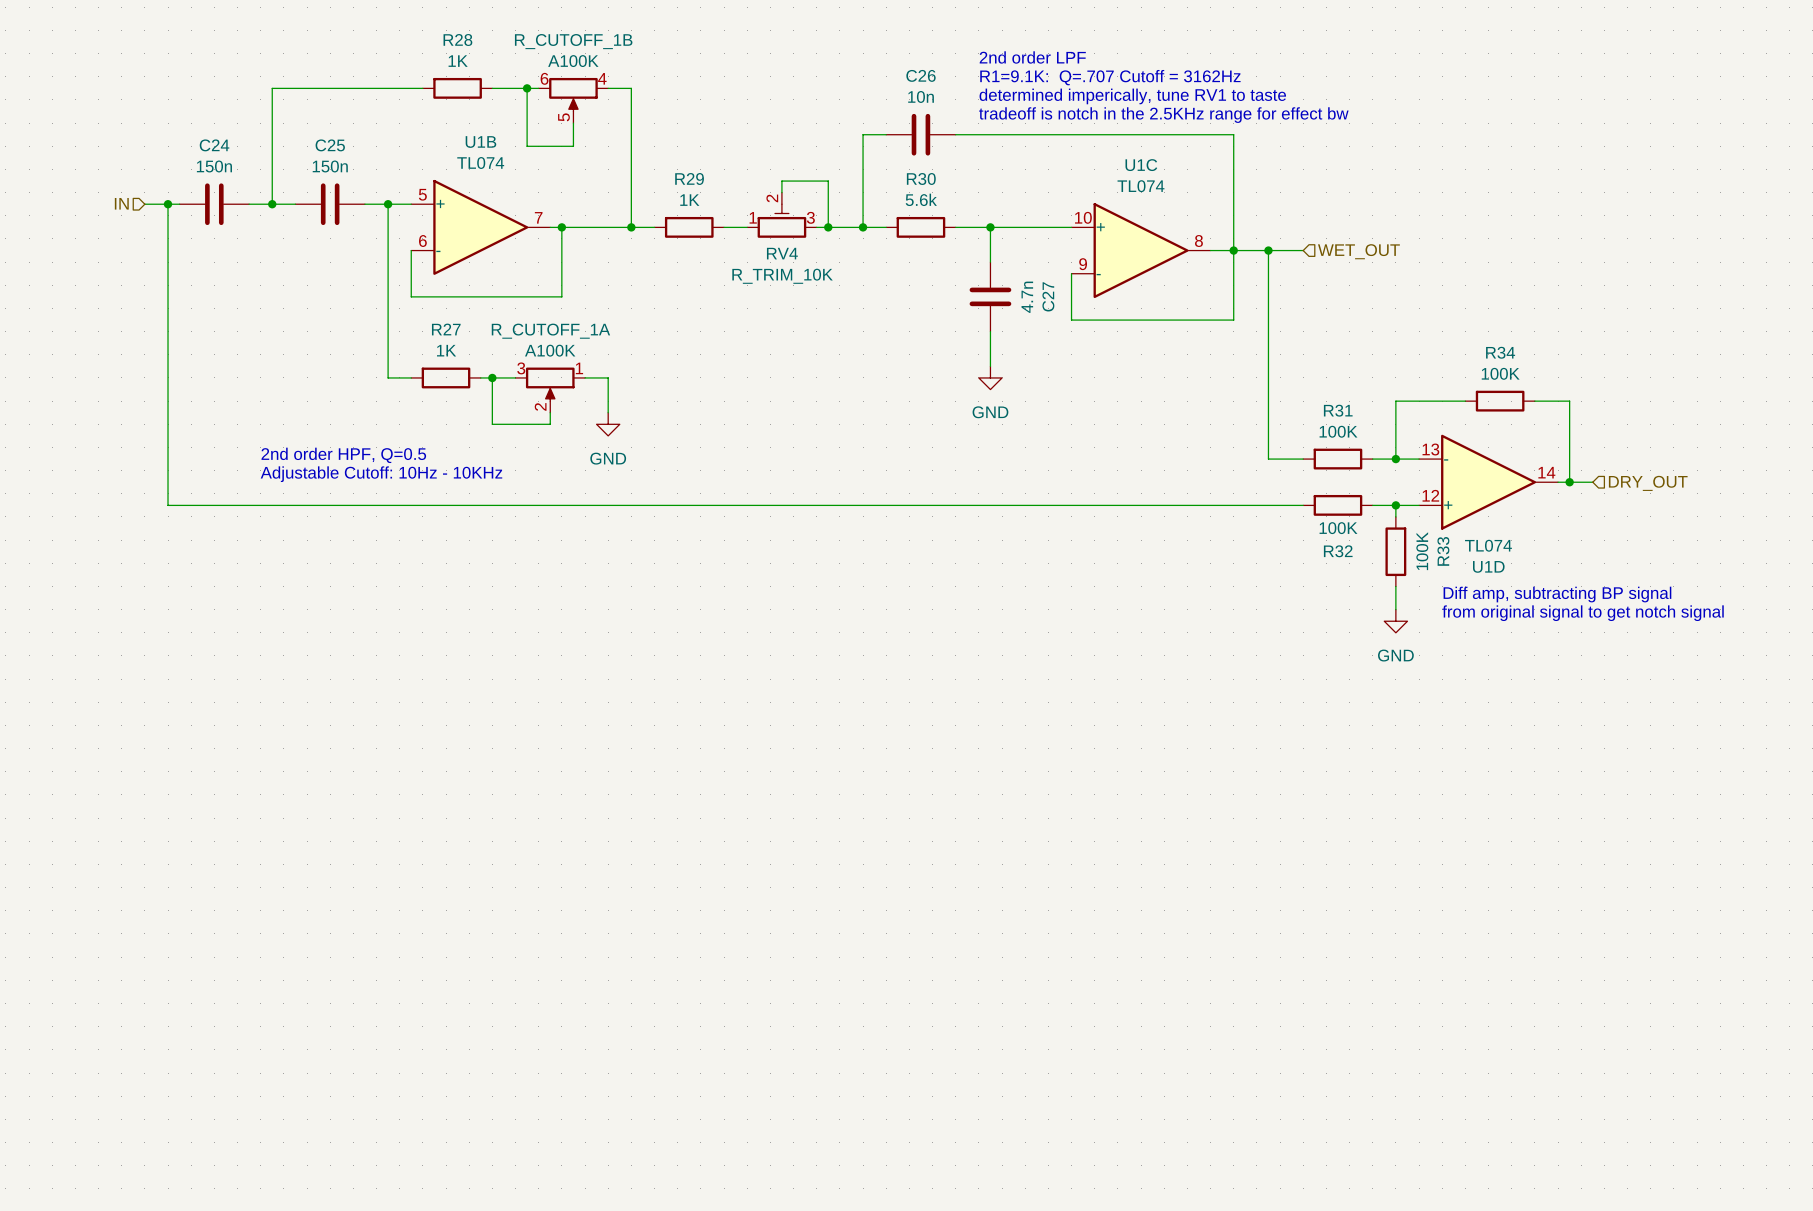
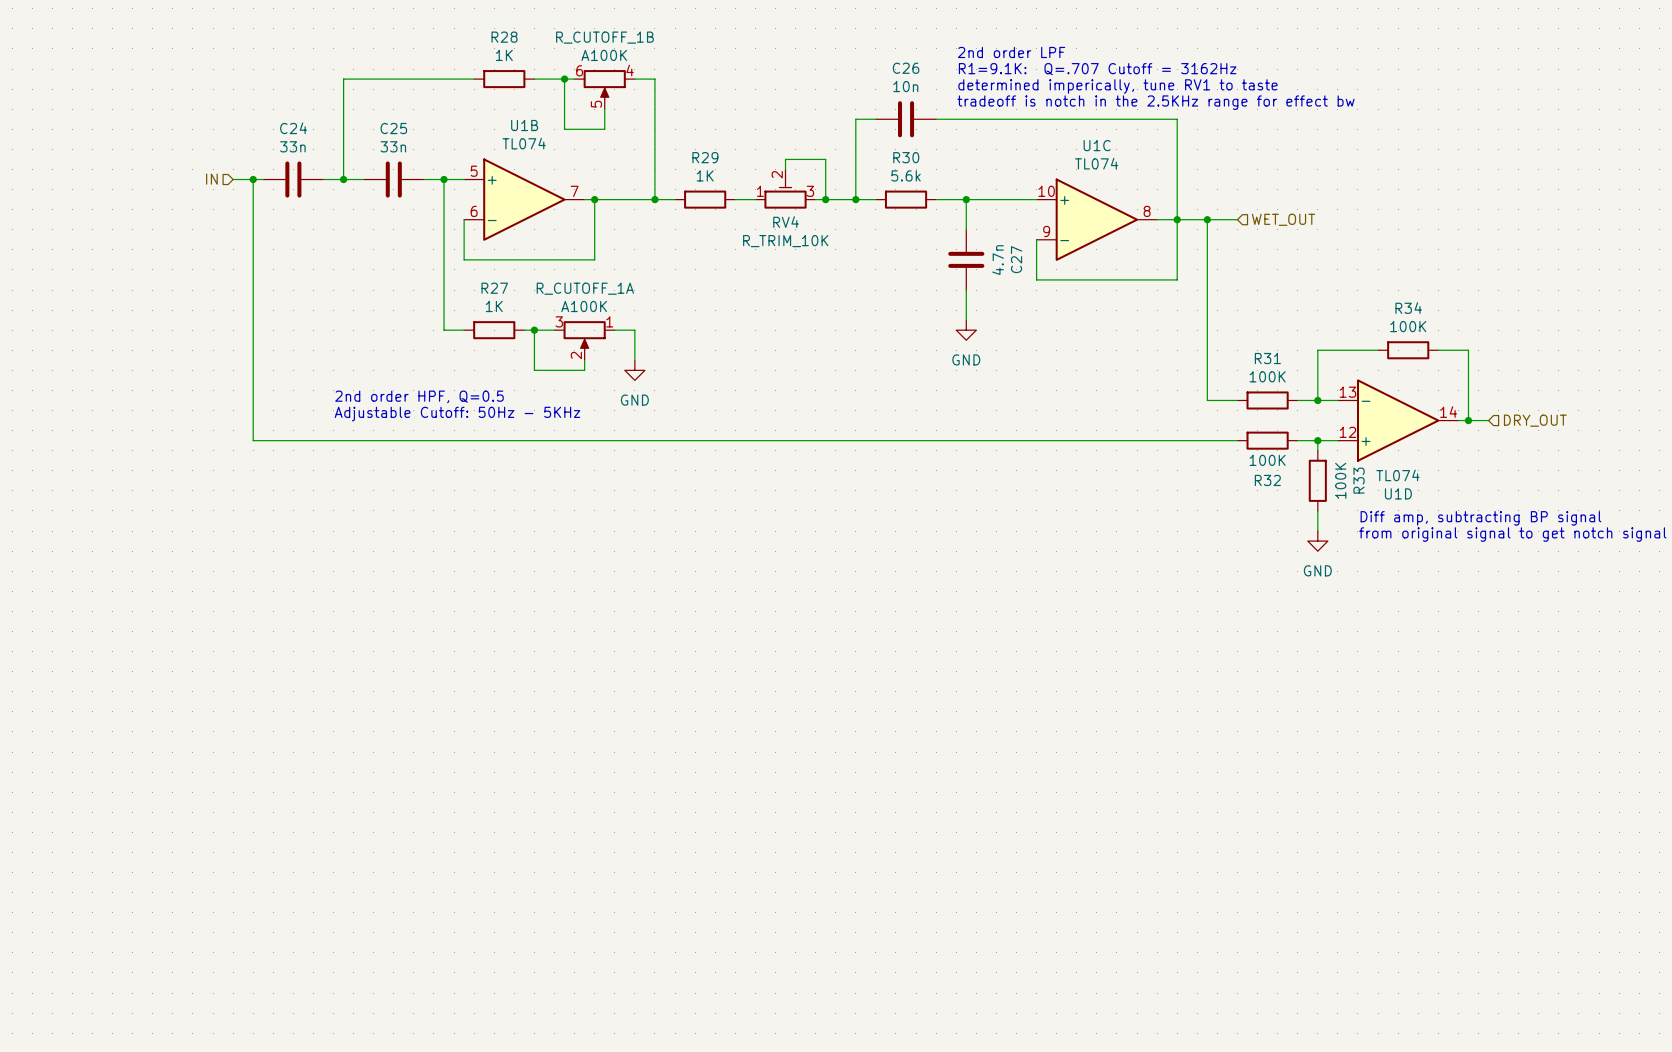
C24 value: 150n (214, 166) -> 33n (292, 146)
C25 value: 150n (330, 166) -> 33n (393, 146)
text: Adjustable Cutoff: 10Hz - 10KHz (381, 474) -> Adjustable Cutoff: 50Hz - 5KHz (457, 414)

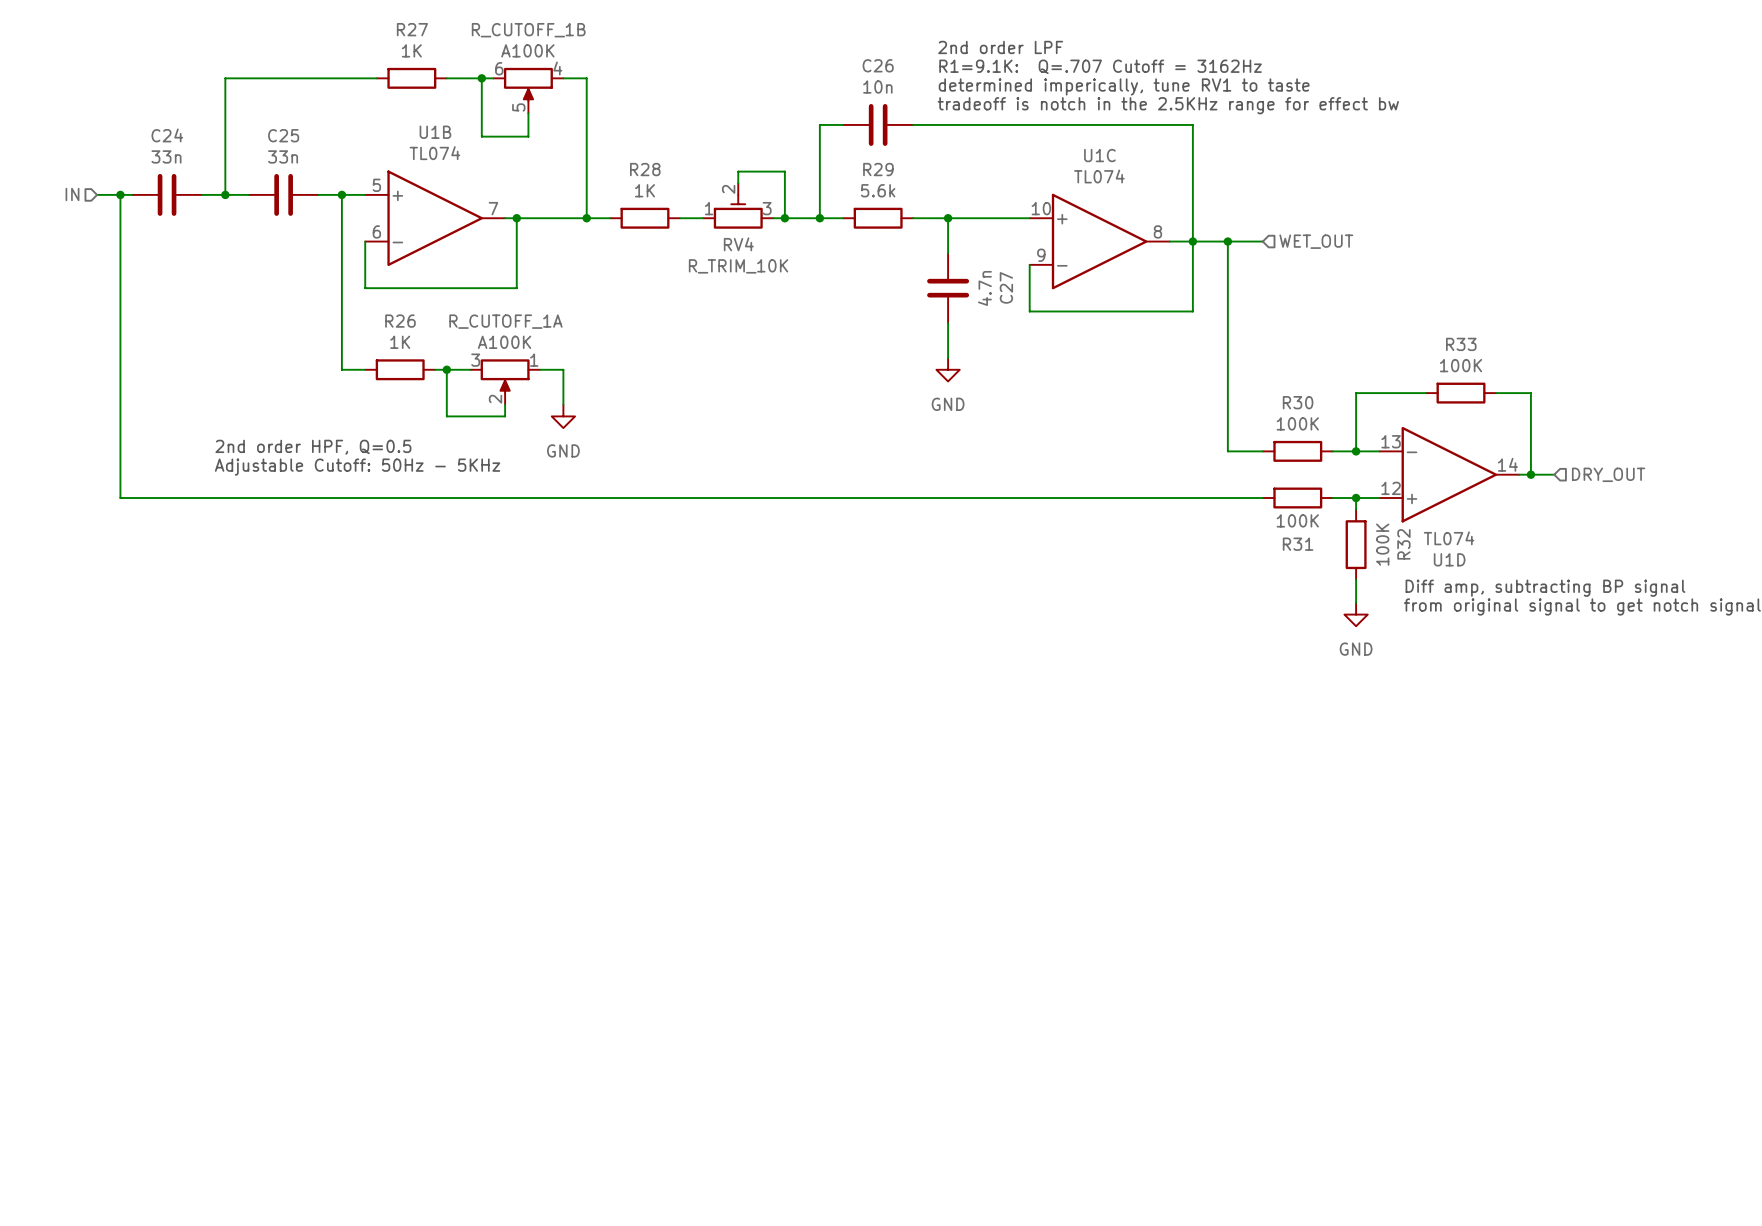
R28 name: R28 (504, 37) -> R27 (412, 29)
R29 name: R29 (705, 157) -> R28 (645, 169)
R30 name: R30 (906, 157) -> R29 (878, 169)
R27 name: R27 (494, 288) -> R26 (400, 321)
R34 name: R34 (1408, 308) -> R33 (1461, 344)
R31 name: R31 (1267, 358) -> R30 (1298, 402)
R32 name: R32 (1267, 480) -> R31 (1298, 544)
R33 name: R33 (1359, 480) -> R32 (1403, 544)

